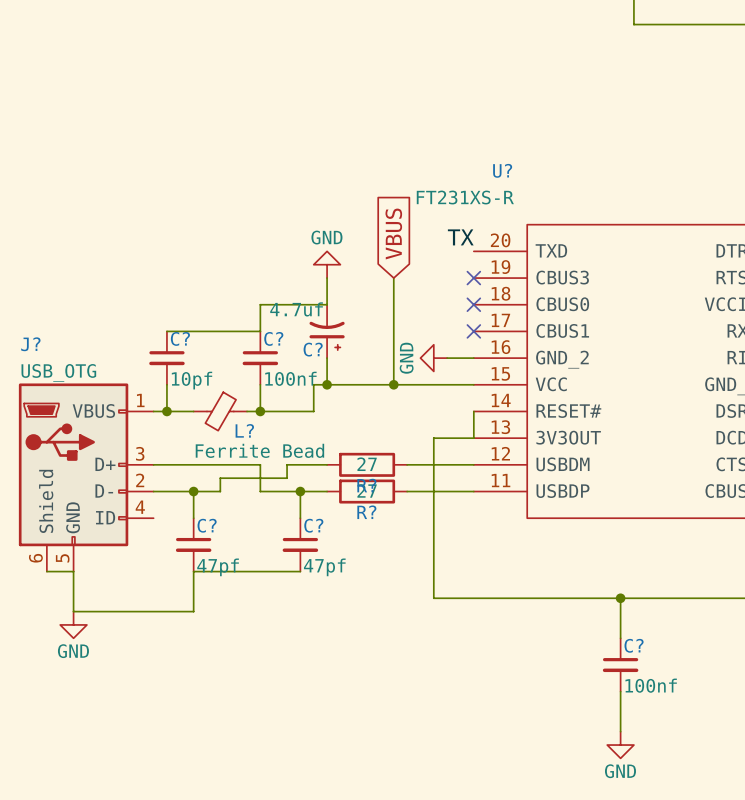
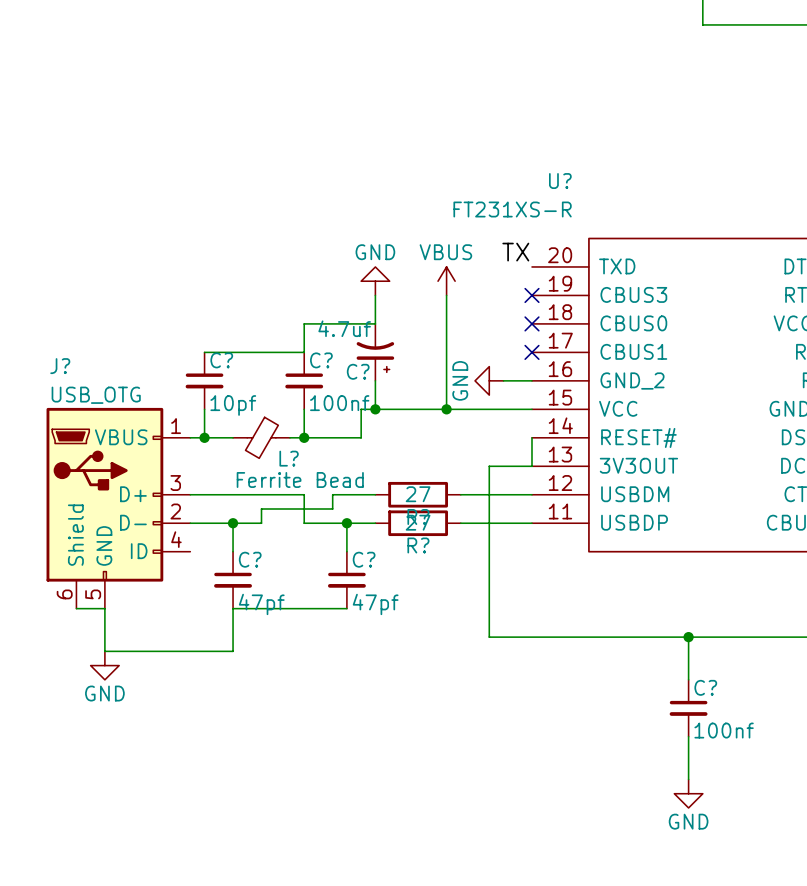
global label: VBUS (393, 234) -> none
power symbol: none -> VBUS (446, 281)

